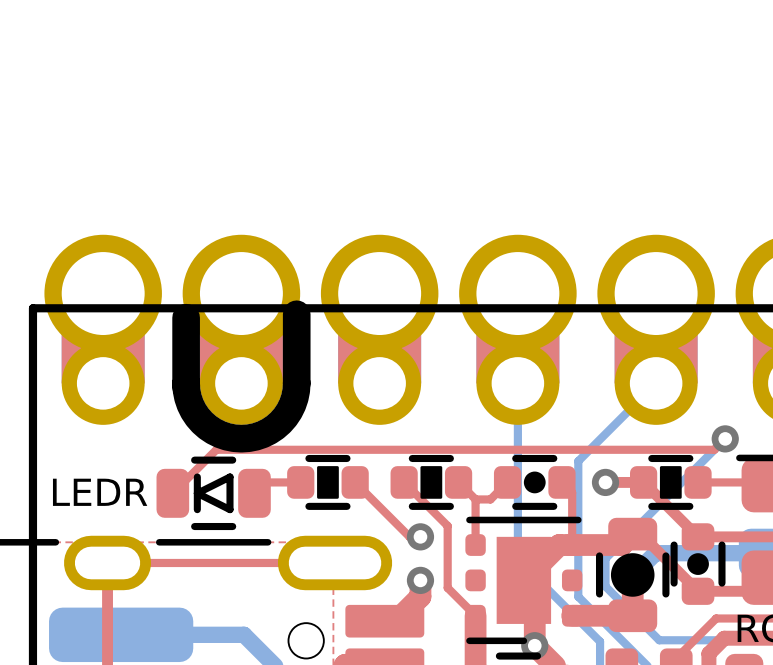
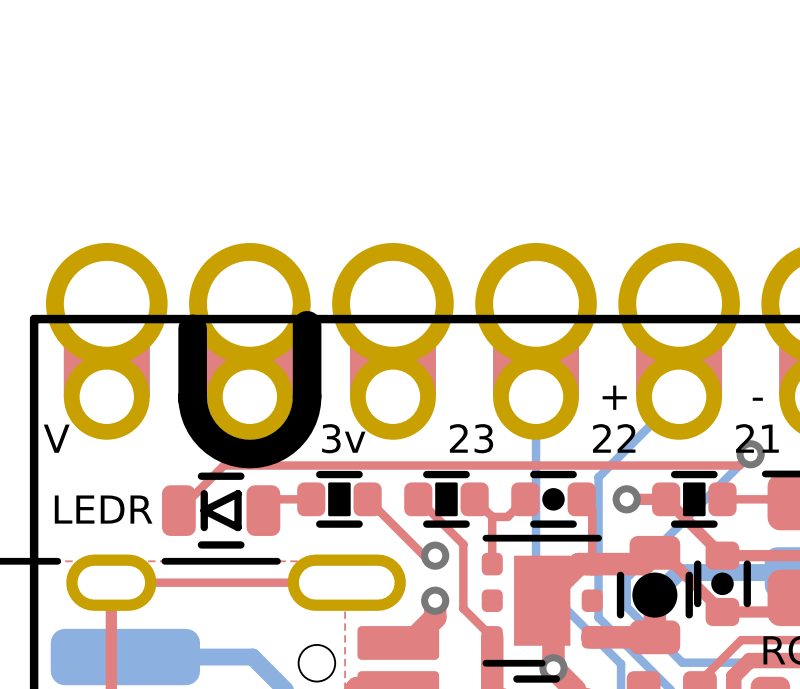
text: none -> + (614, 397)
text: none -> - (757, 399)
text: none -> V (56, 438)
text: none -> 3v (343, 438)
text: none -> 23 (471, 438)
text: none -> 22 (614, 438)
text: none -> 21 (757, 438)

